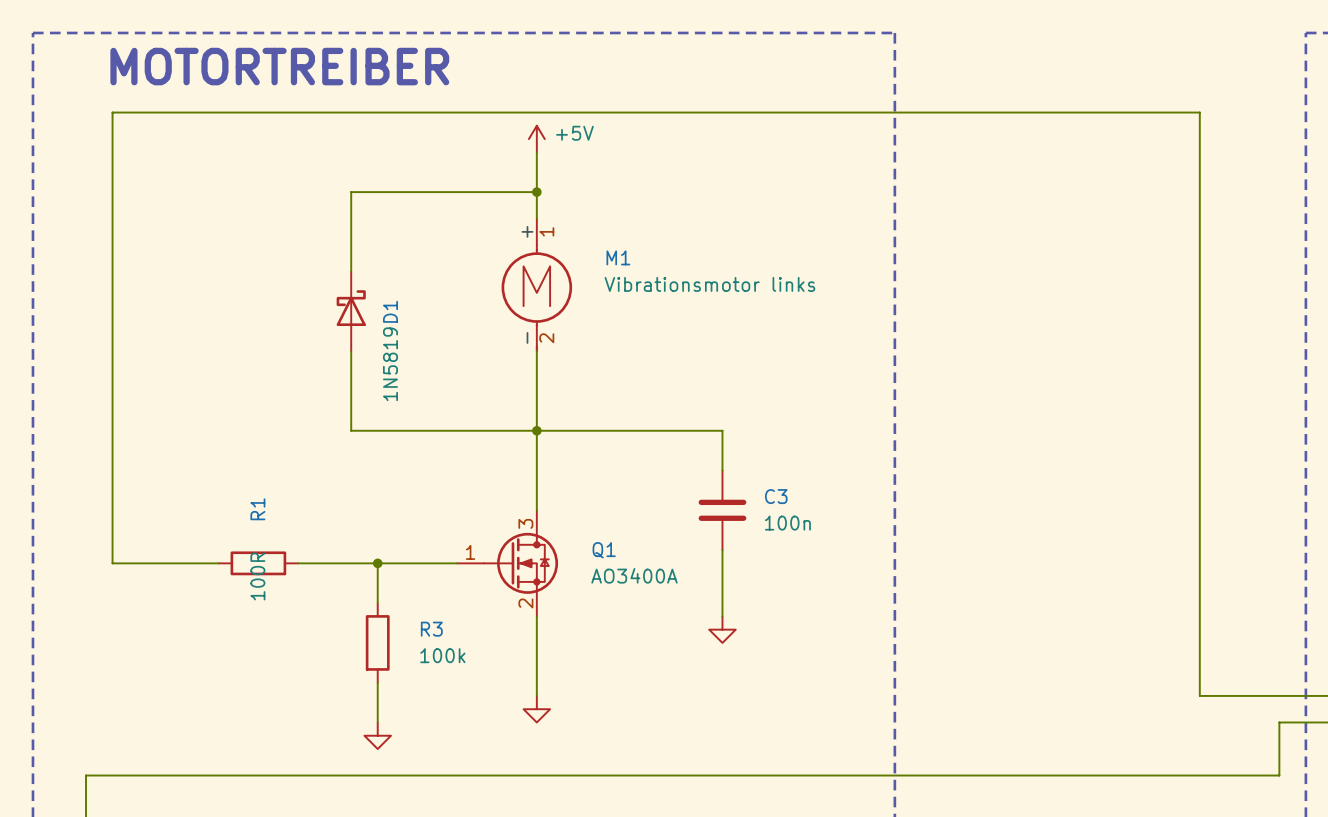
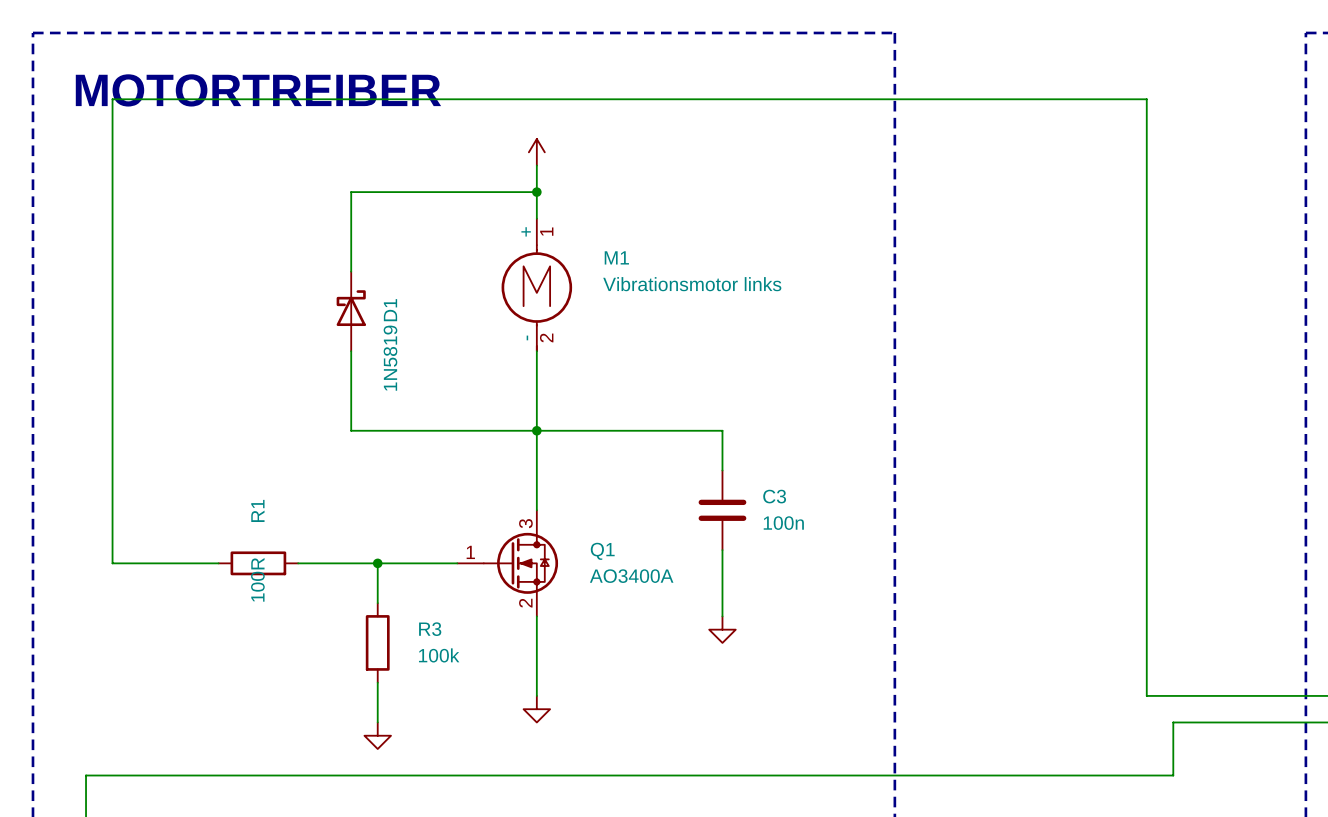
text position: MOTORTREIBER (279, 66) -> MOTORTREIBER (258, 90)
wire: (112, 112) (1199, 112) (1199, 695) -> (112, 112) (112, 99) (1146, 99) (1146, 695) (1199, 695)
power symbol: +5V (536, 139) -> none
power symbol: none -> (536, 152)
wire: (1279, 722) (1279, 775) (1173, 775) -> (1279, 722) (1173, 722) (1173, 775)

